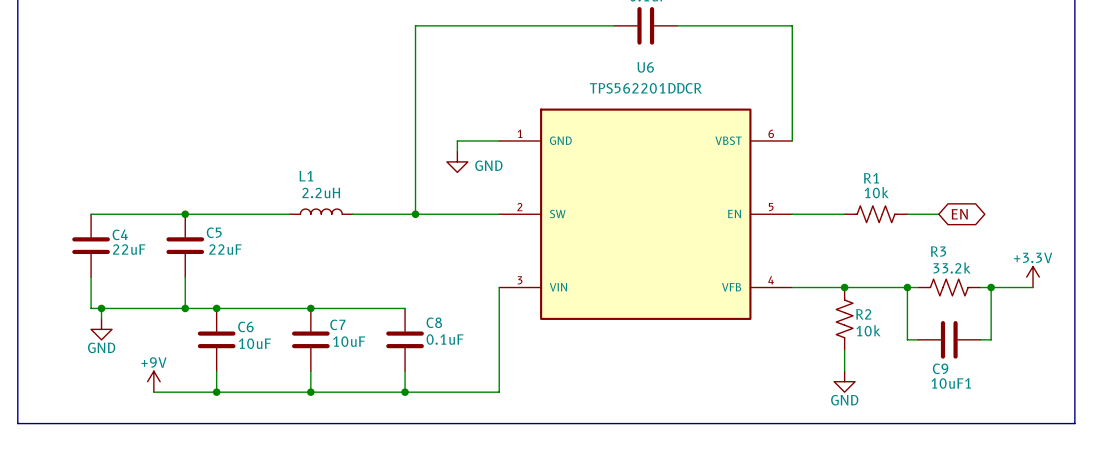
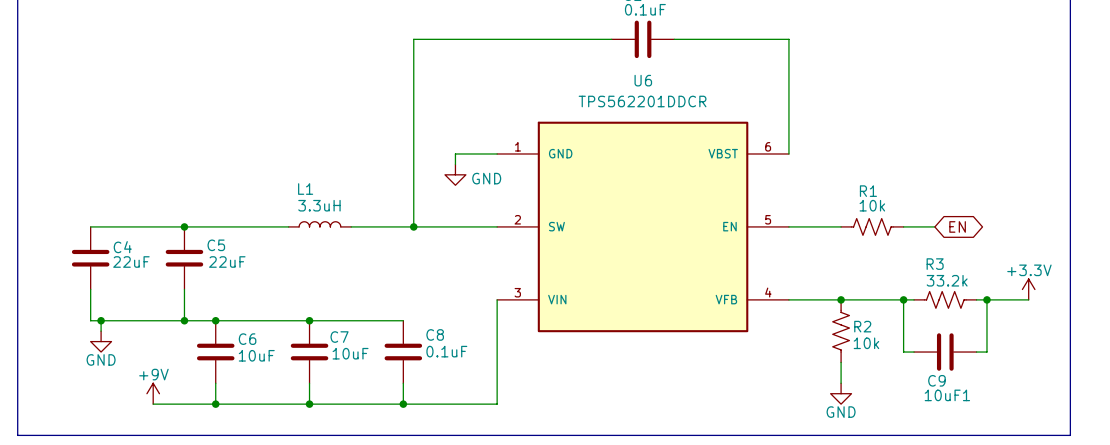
L1 value: 2.2uH (321, 192) -> 3.3uH (319, 205)

